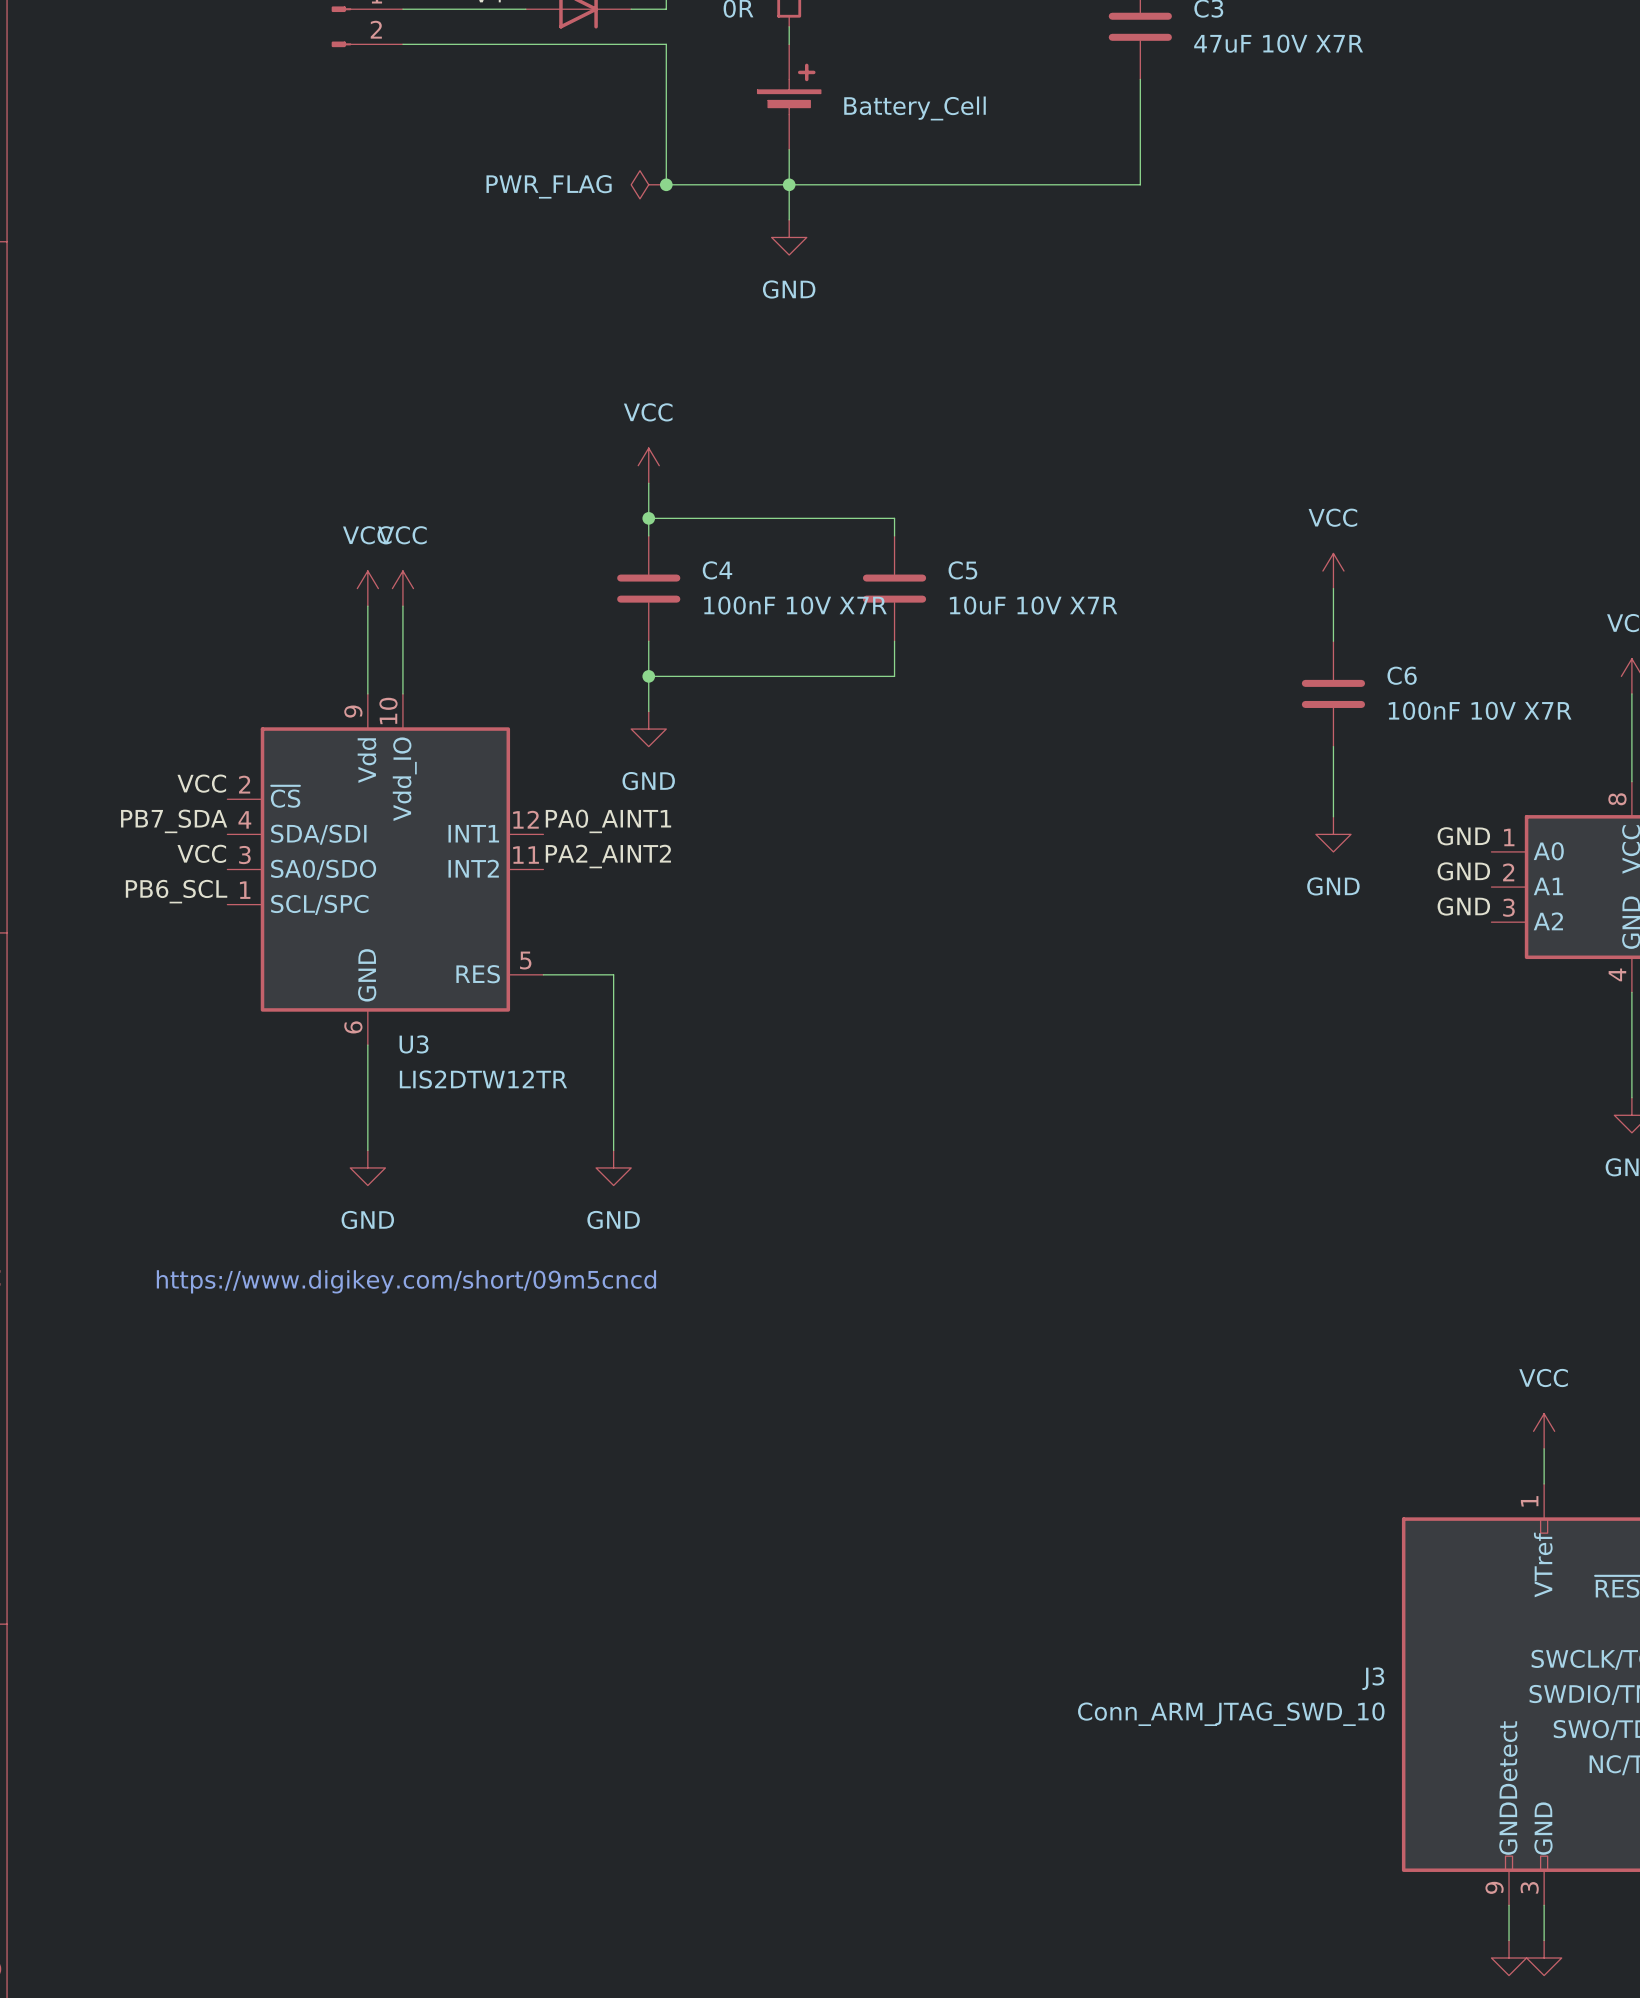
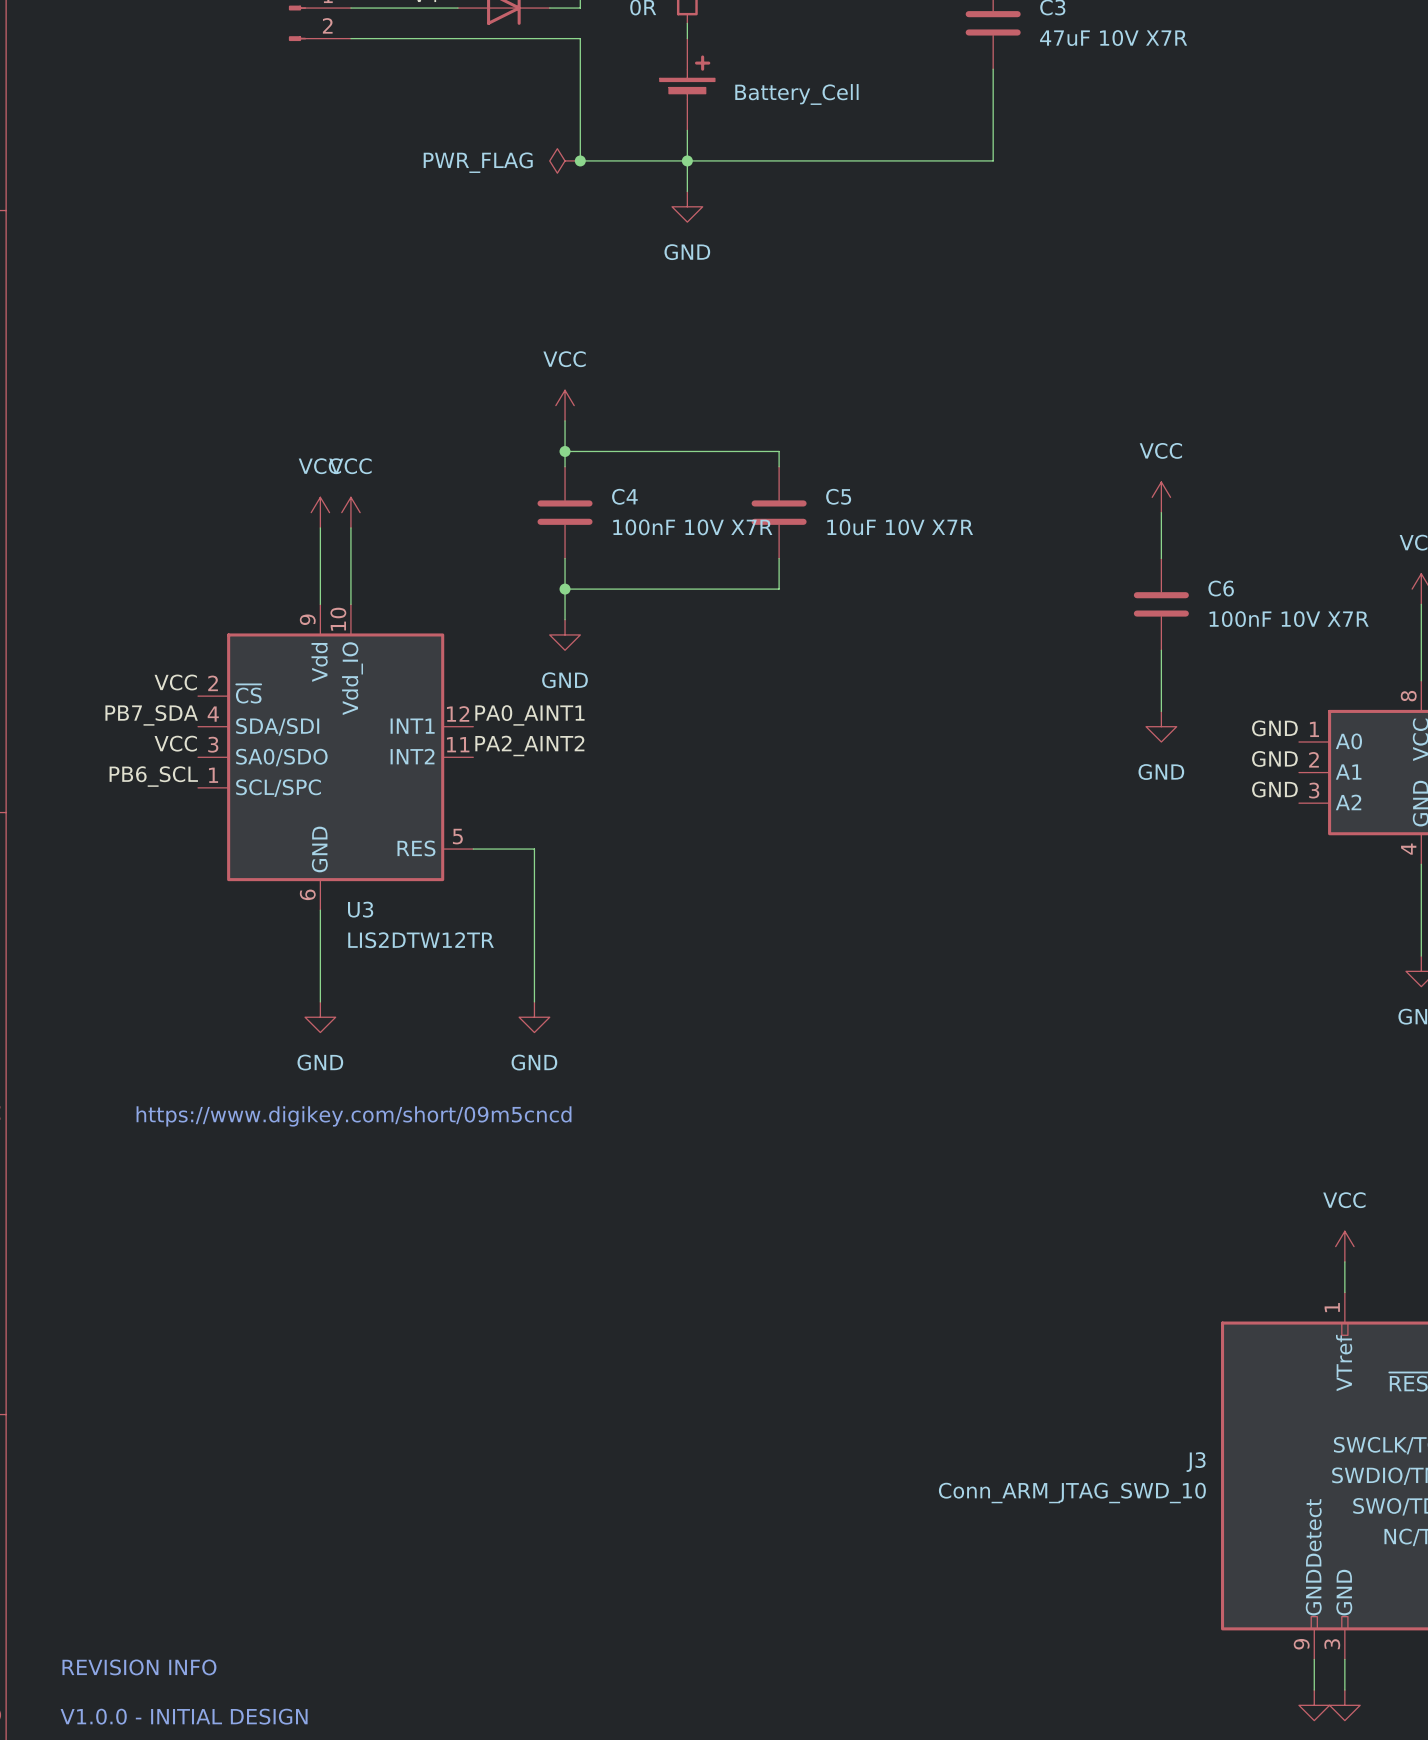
text: none -> REVISION INFO (139, 1667)
text: none -> V1.0.0 - INITIAL DESIGN (184, 1716)

